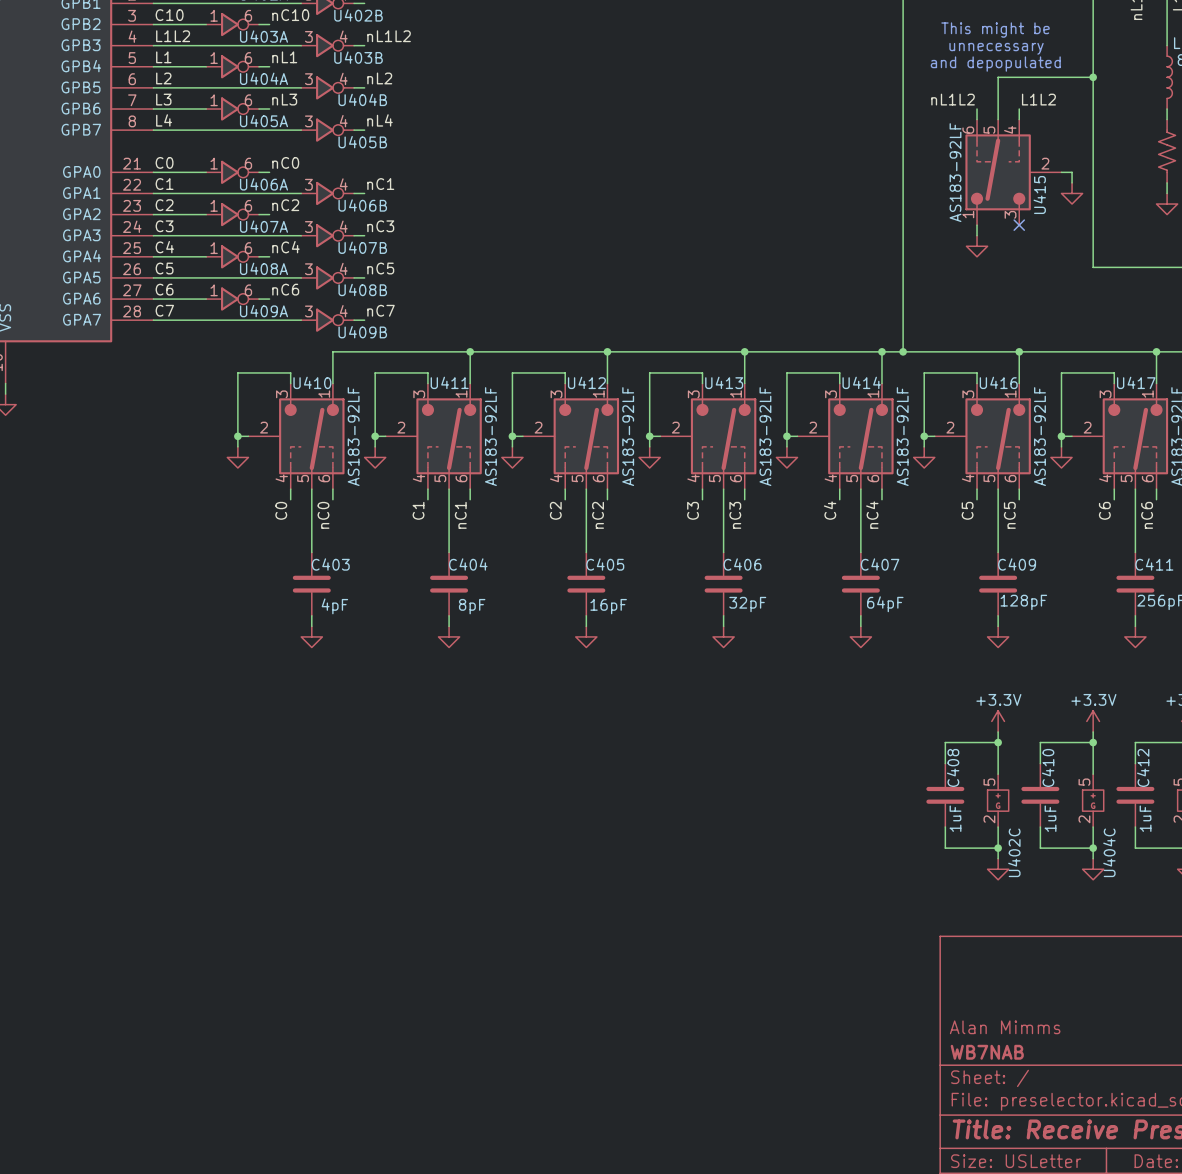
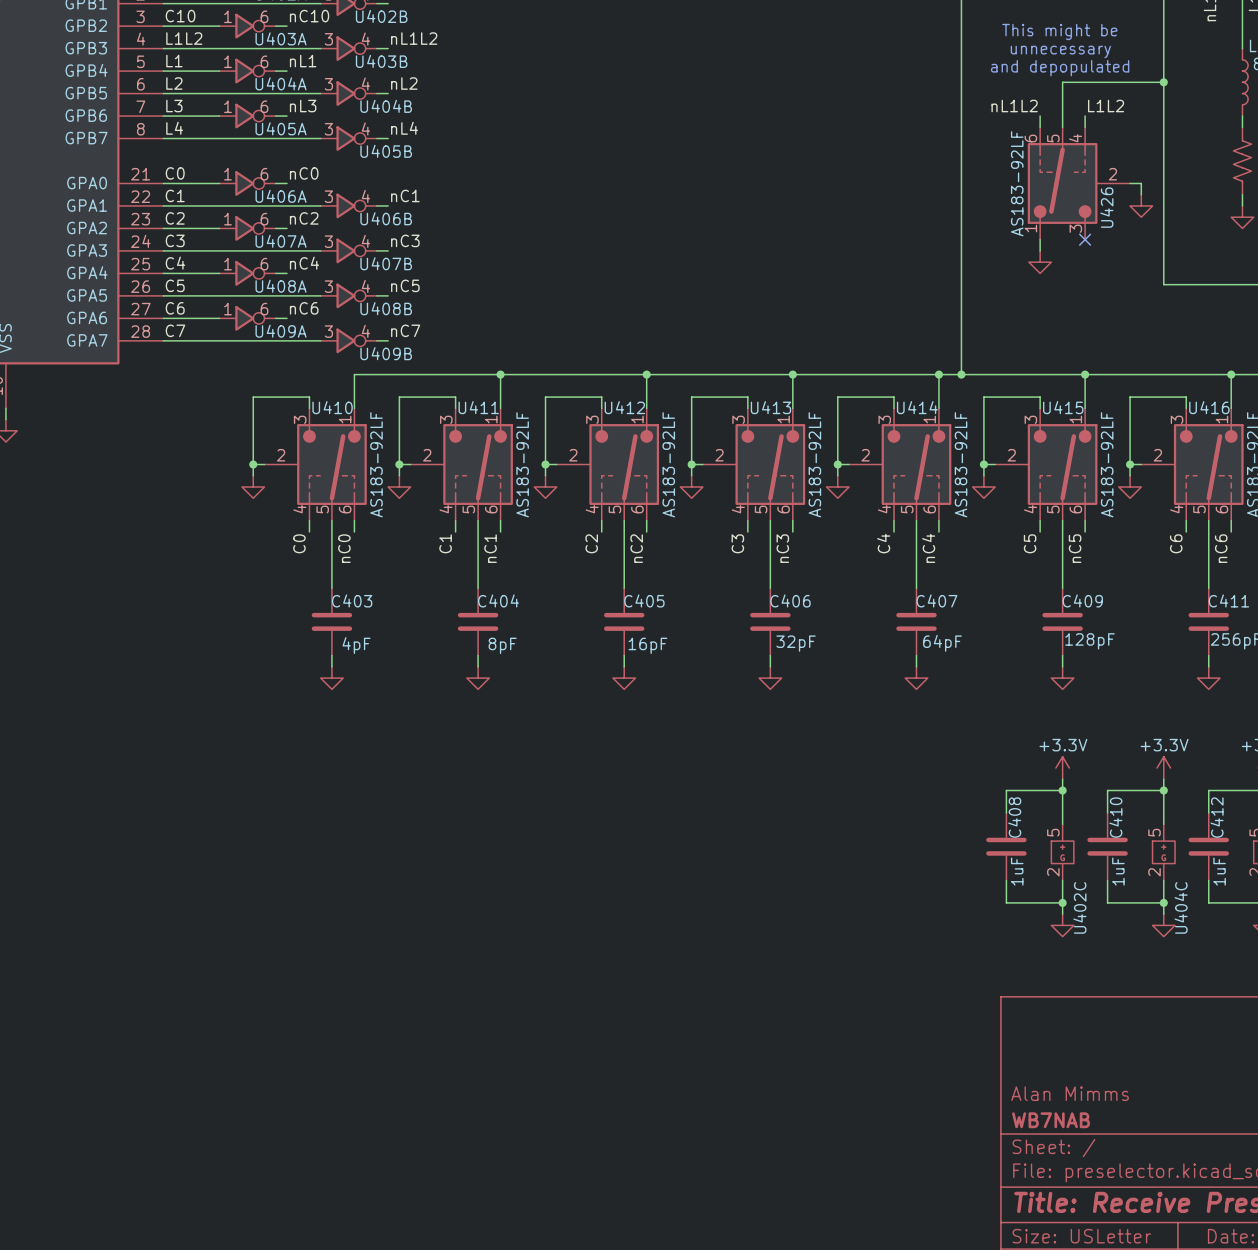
U415 name: U415 (1039, 195) -> U426 (1106, 207)
U416 name: U416 (998, 382) -> U415 (1063, 407)
U417 name: U417 (1136, 382) -> U416 (1209, 407)

